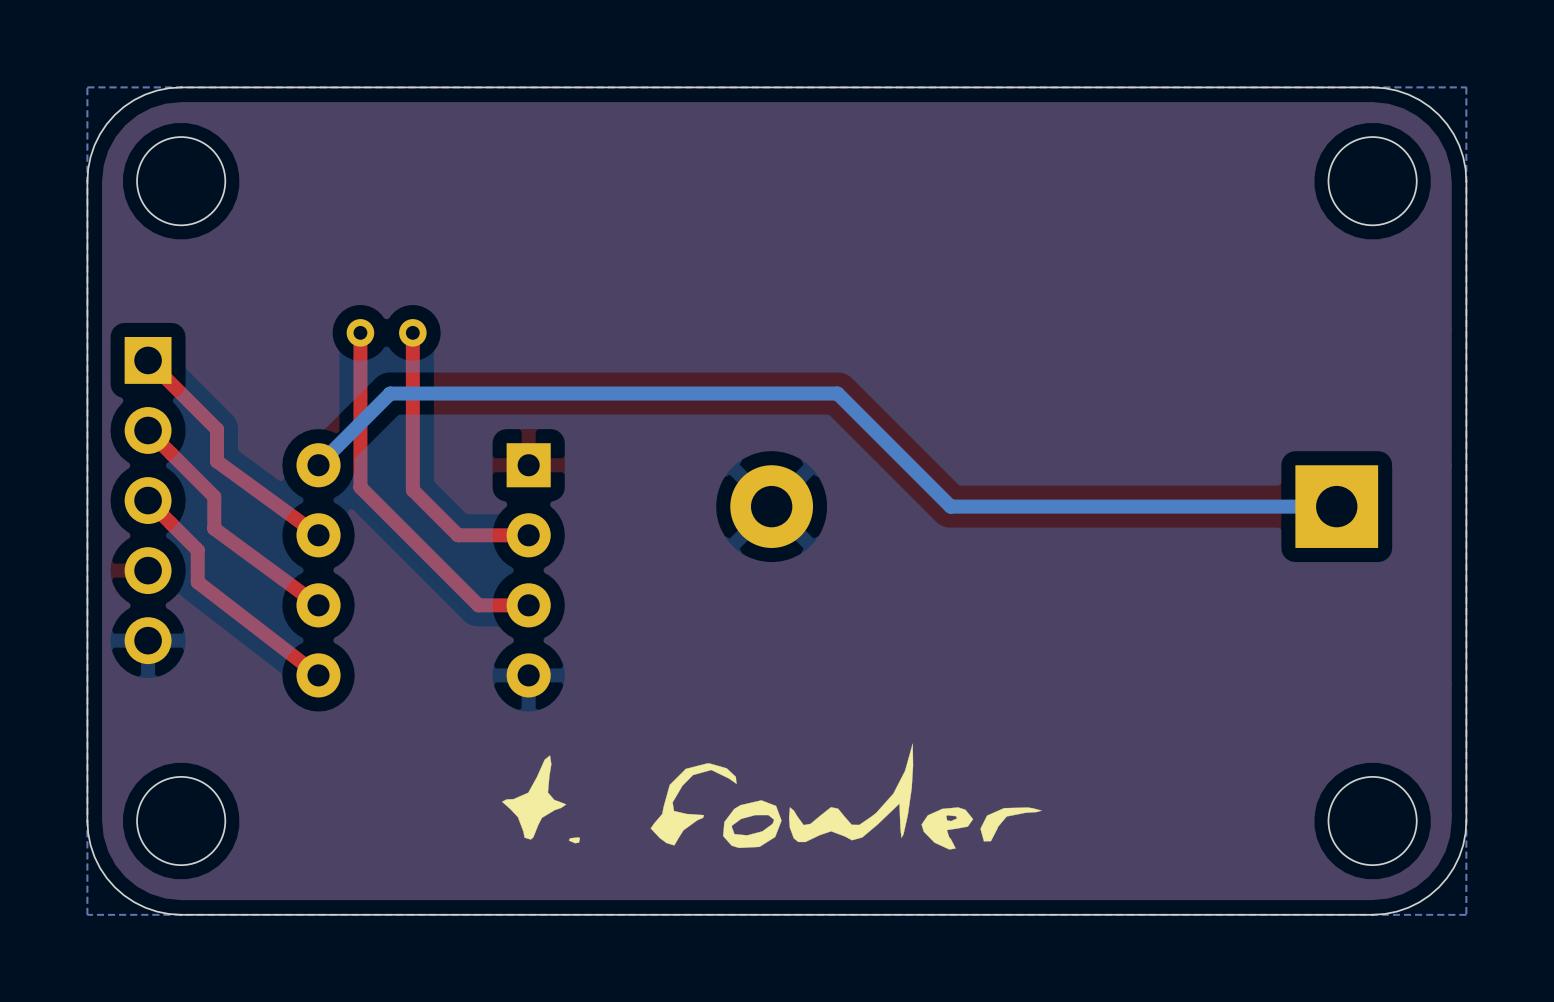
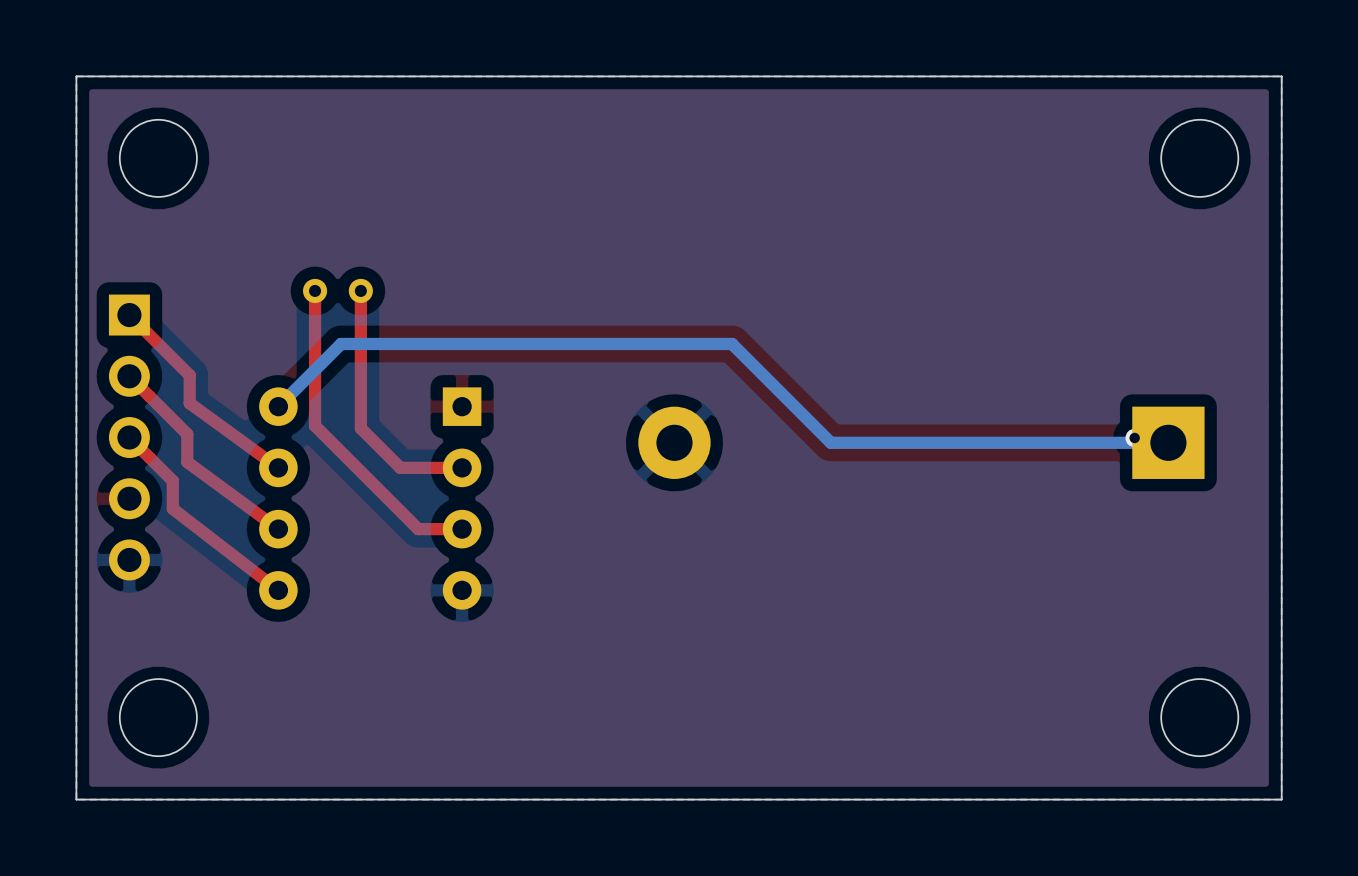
board edge: (181, 87) (156, 90) (145, 94) (134, 99) (114, 114) (106, 124) (94, 145) (90, 156) (87, 181) -> (158, 76) (76, 76) (76, 158)
board edge: (1372, 87) (1384, 88) (1408, 94) (1429, 106) (1438, 114) (1453, 134) (1459, 145) (1463, 156) (1466, 181) -> (1199, 76) (1281, 76) (1281, 158)
via: none -> (1134, 437)
drawing: [501, 743, 1042, 850] -> none
board edge: (87, 821) (90, 845) (94, 856) (99, 867) (114, 887) (134, 902) (145, 907) (168, 913) (181, 914) -> (76, 717) (76, 799) (158, 799)
board edge: (1466, 821) (1463, 845) (1459, 856) (1447, 878) (1438, 887) (1429, 895) (1408, 907) (1384, 913) (1372, 914) -> (1281, 717) (1281, 799) (1199, 799)

